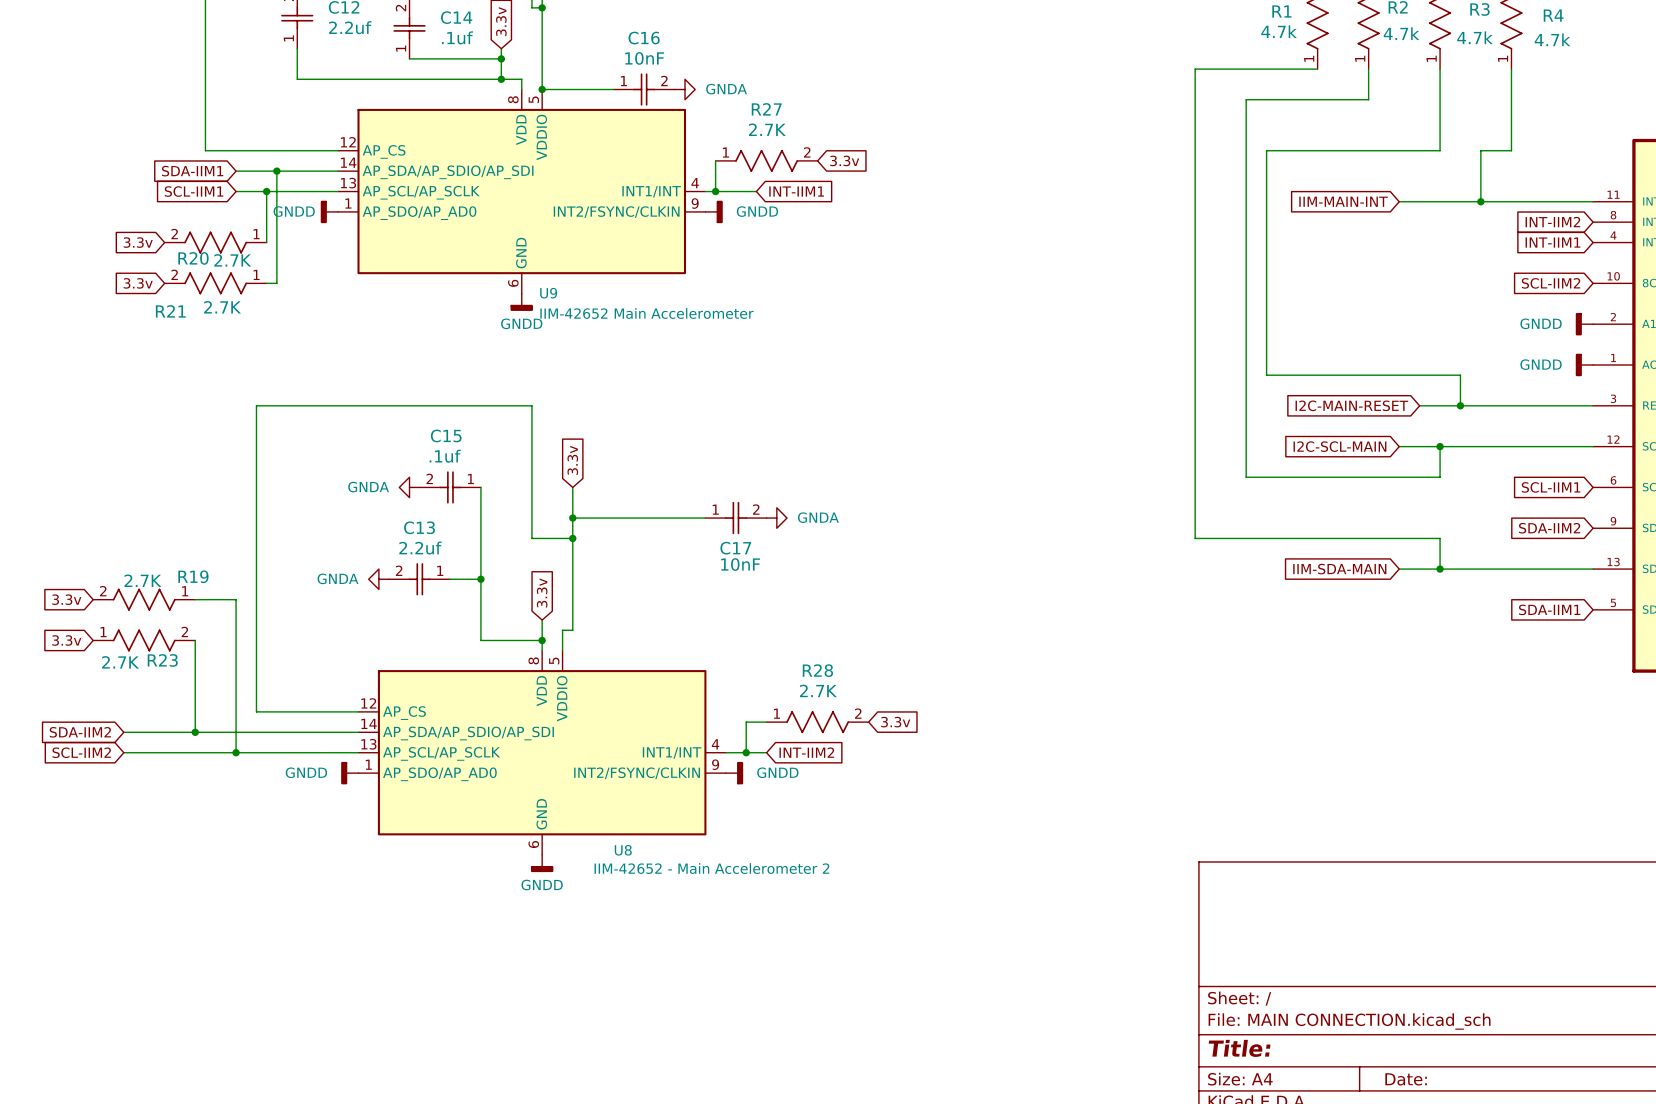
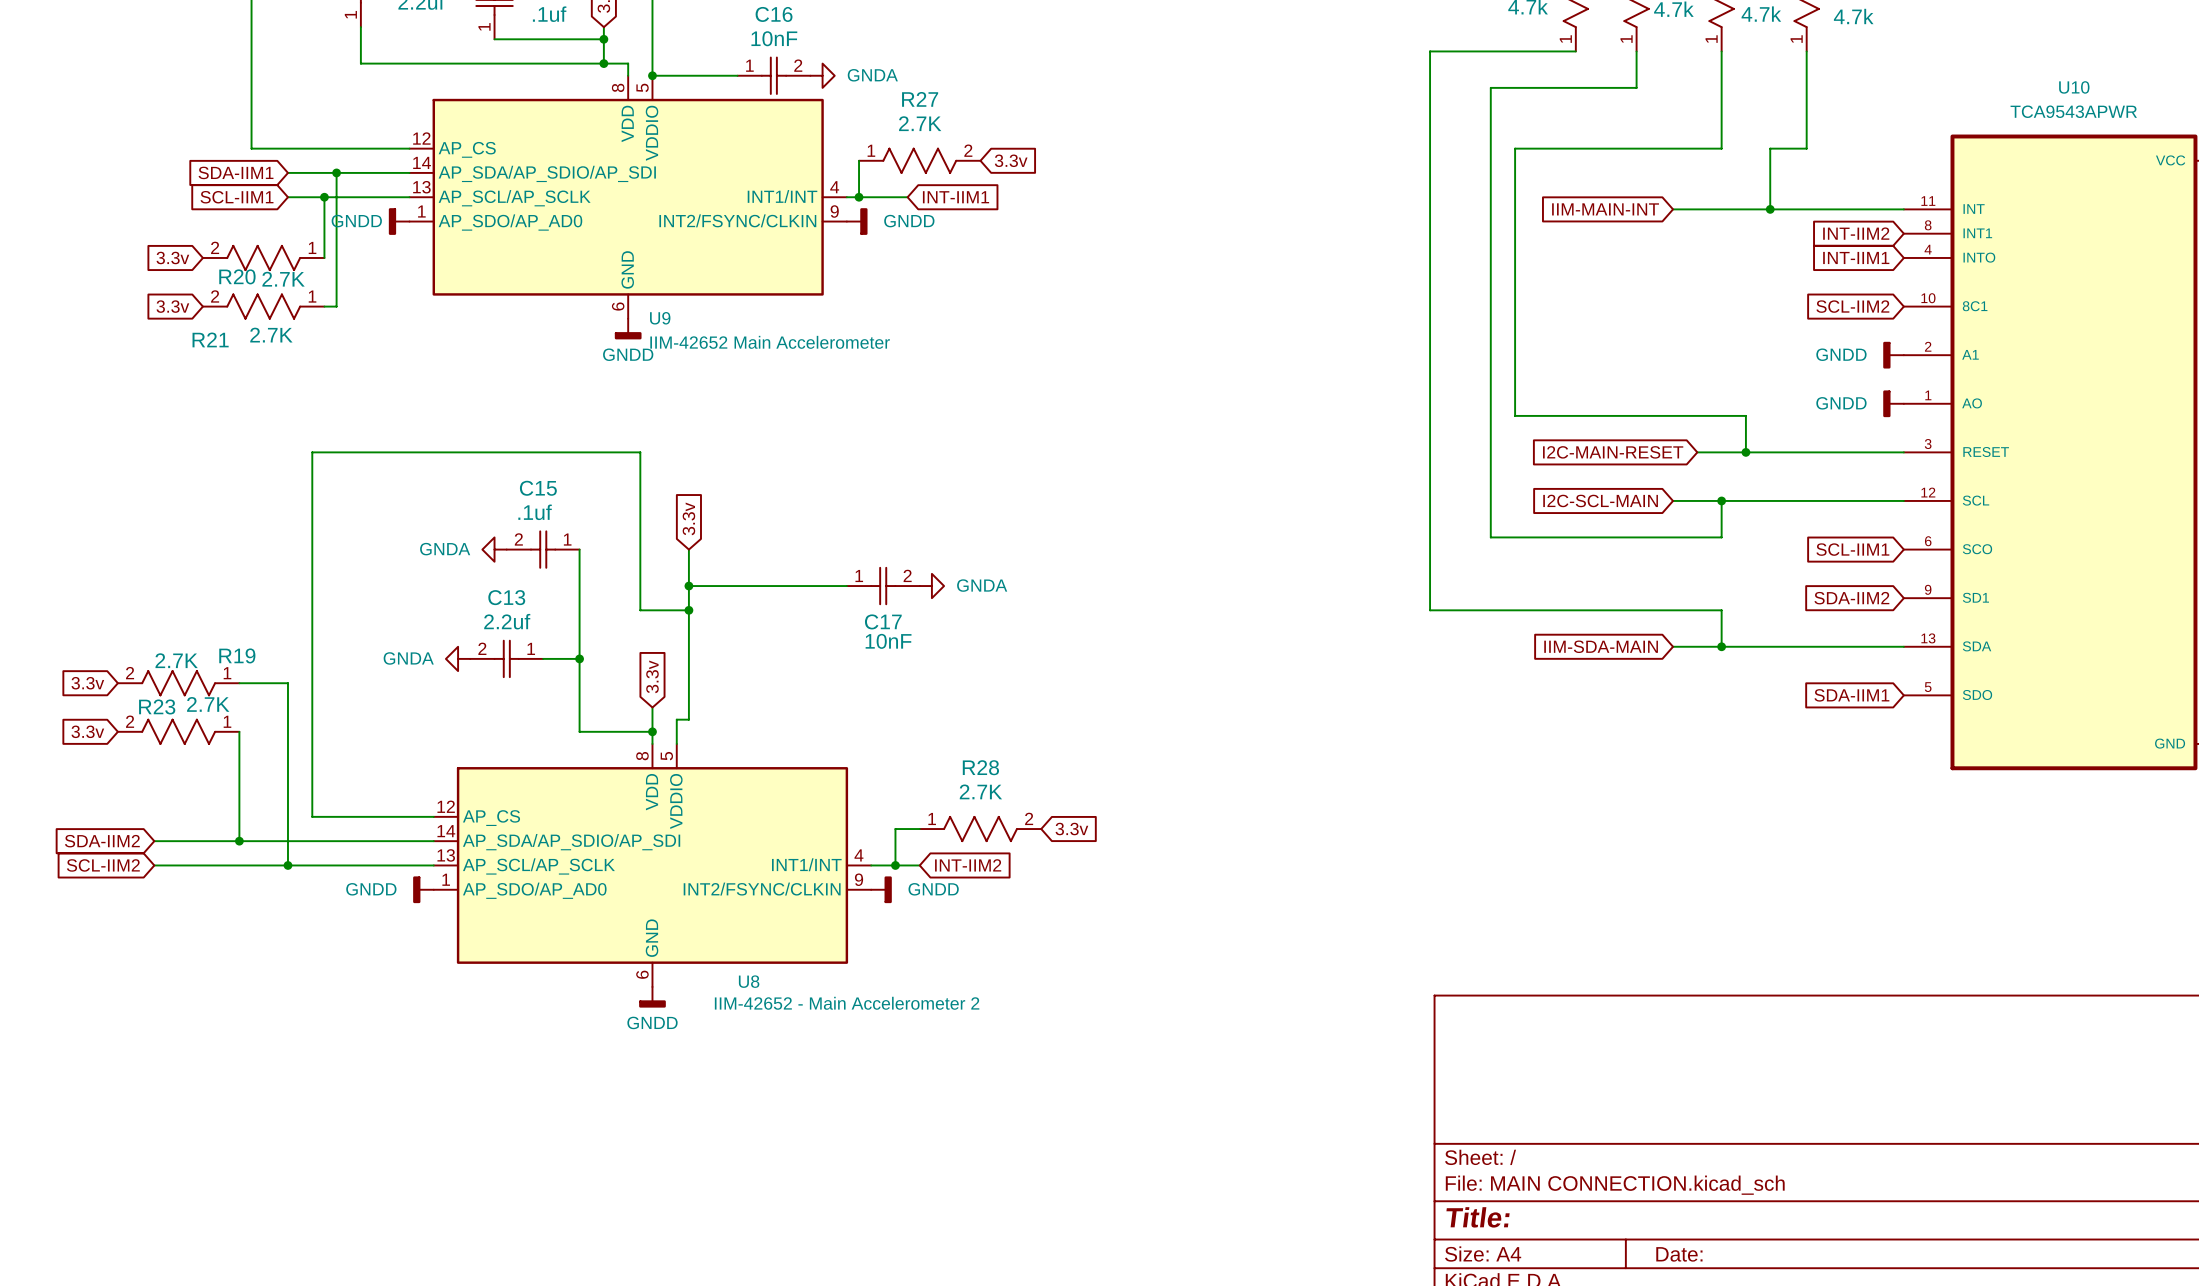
R23 rotation: 0° (144, 640) -> 180° (178, 731)

